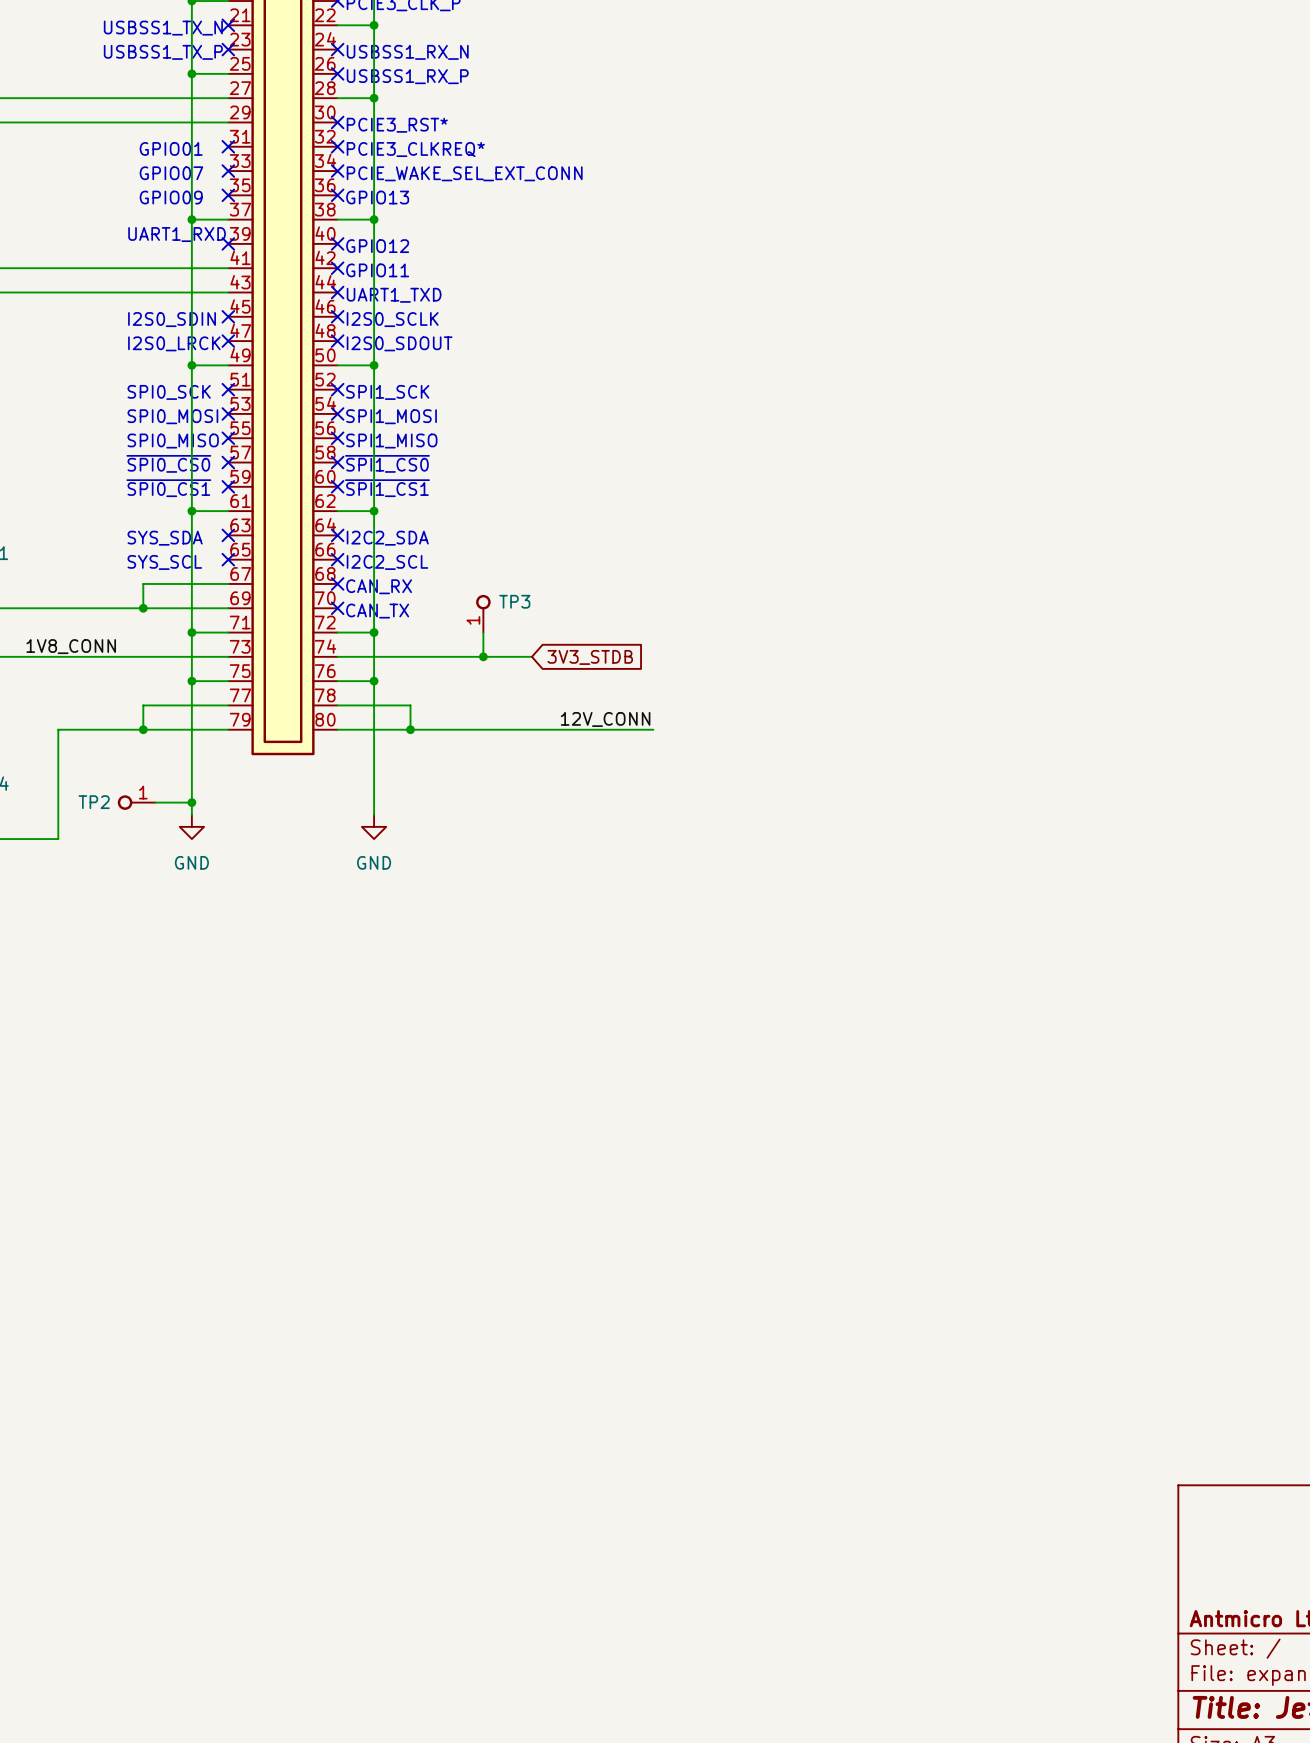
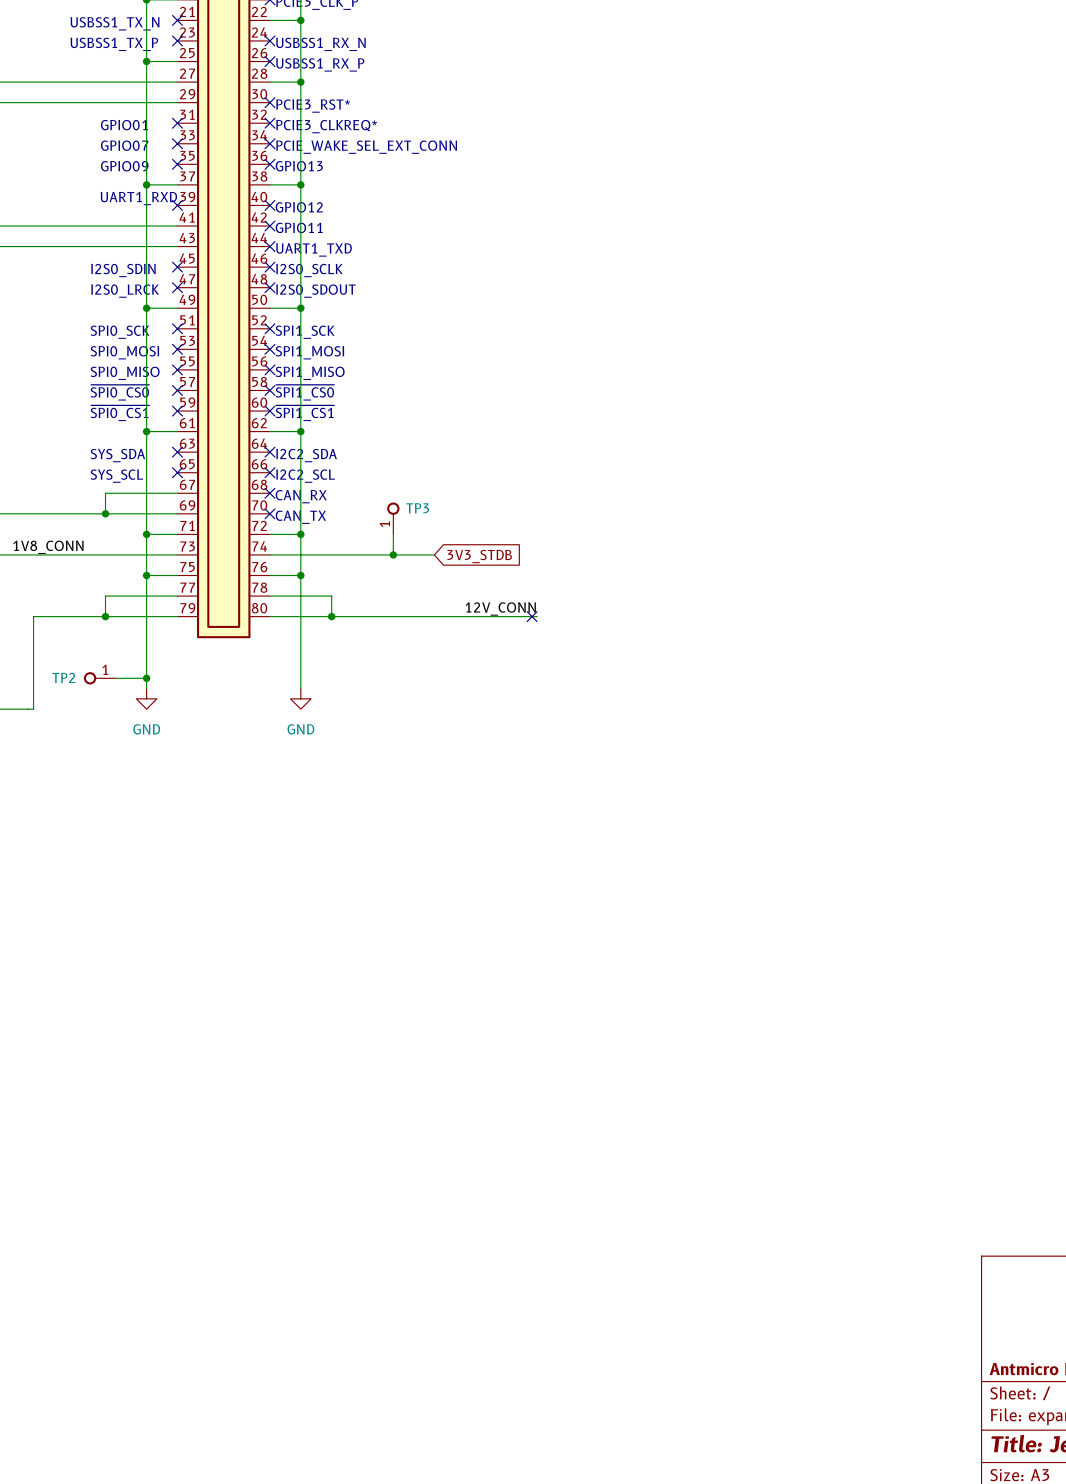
no-connect mark: none -> (532, 616)

